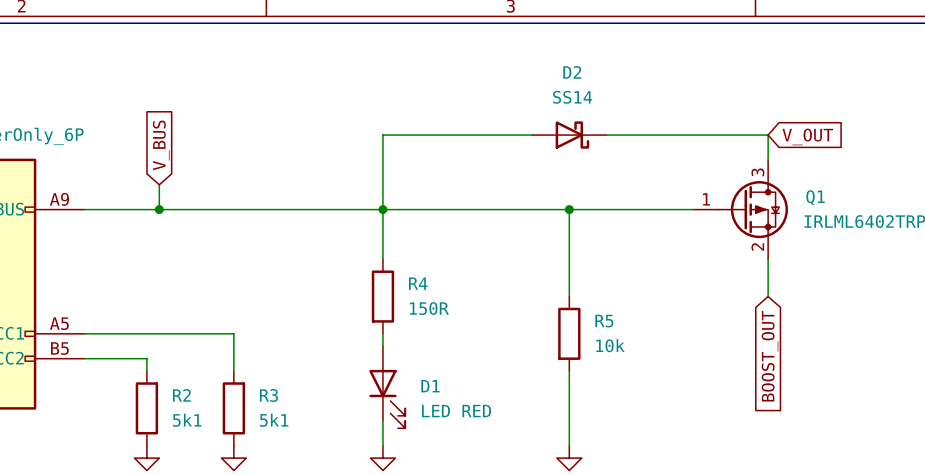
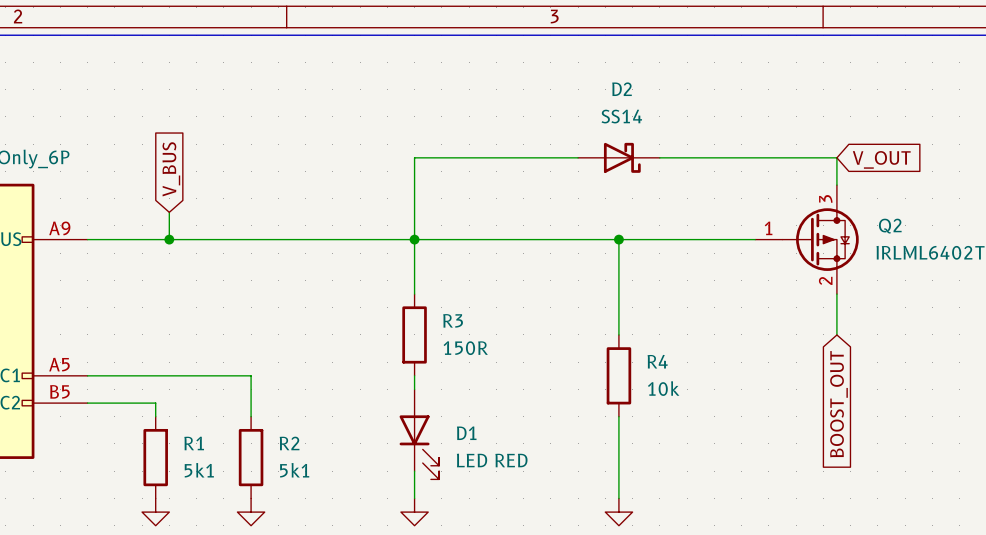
Q1 name: Q1 (815, 197) -> Q2 (890, 226)
R4 name: R4 (418, 283) -> R3 (453, 320)
R5 name: R5 (604, 321) -> R4 (657, 361)
R2 name: R2 (181, 395) -> R1 (194, 443)
R3 name: R3 (268, 395) -> R2 (289, 443)

